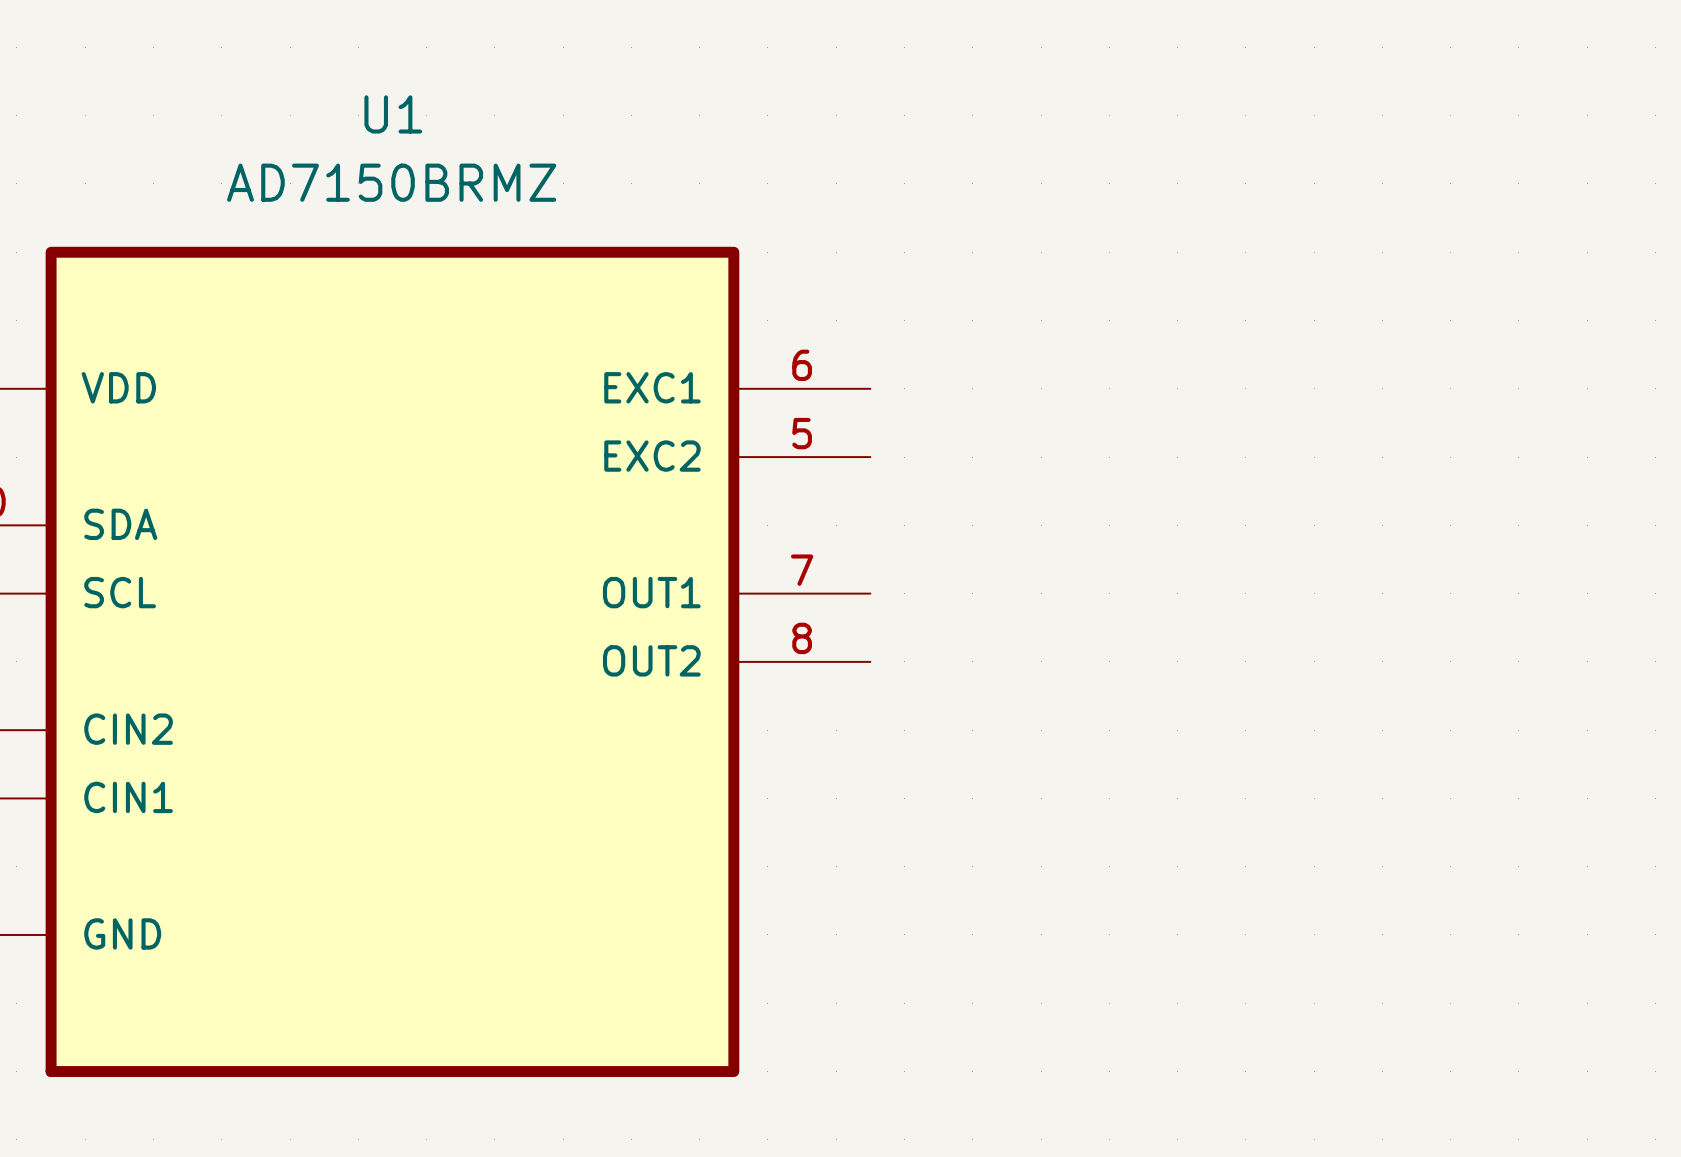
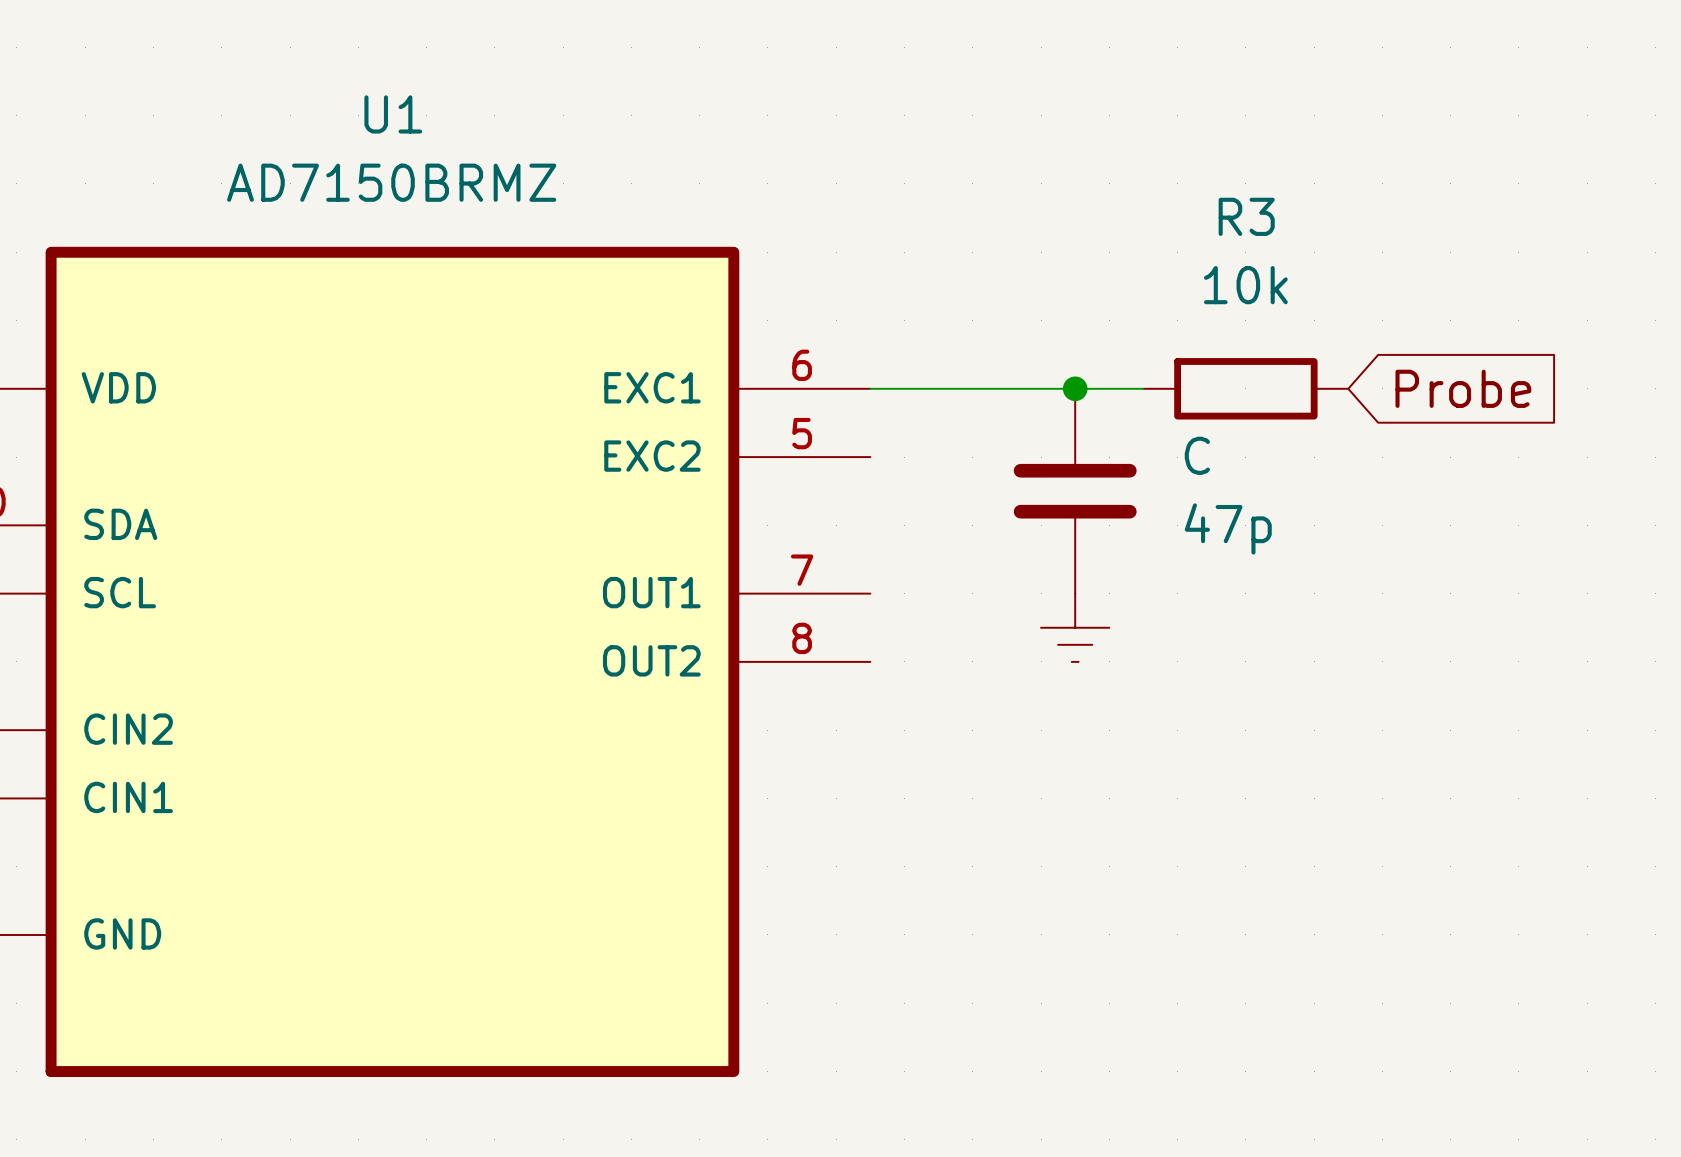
wire: none -> (870, 388) (1143, 388)
junction: none -> (1075, 388)
R3: none -> 10k (1245, 388)
global label: none -> Probe (1463, 388)
C: none -> 47p (1075, 491)
power symbol: none -> (1075, 627)

